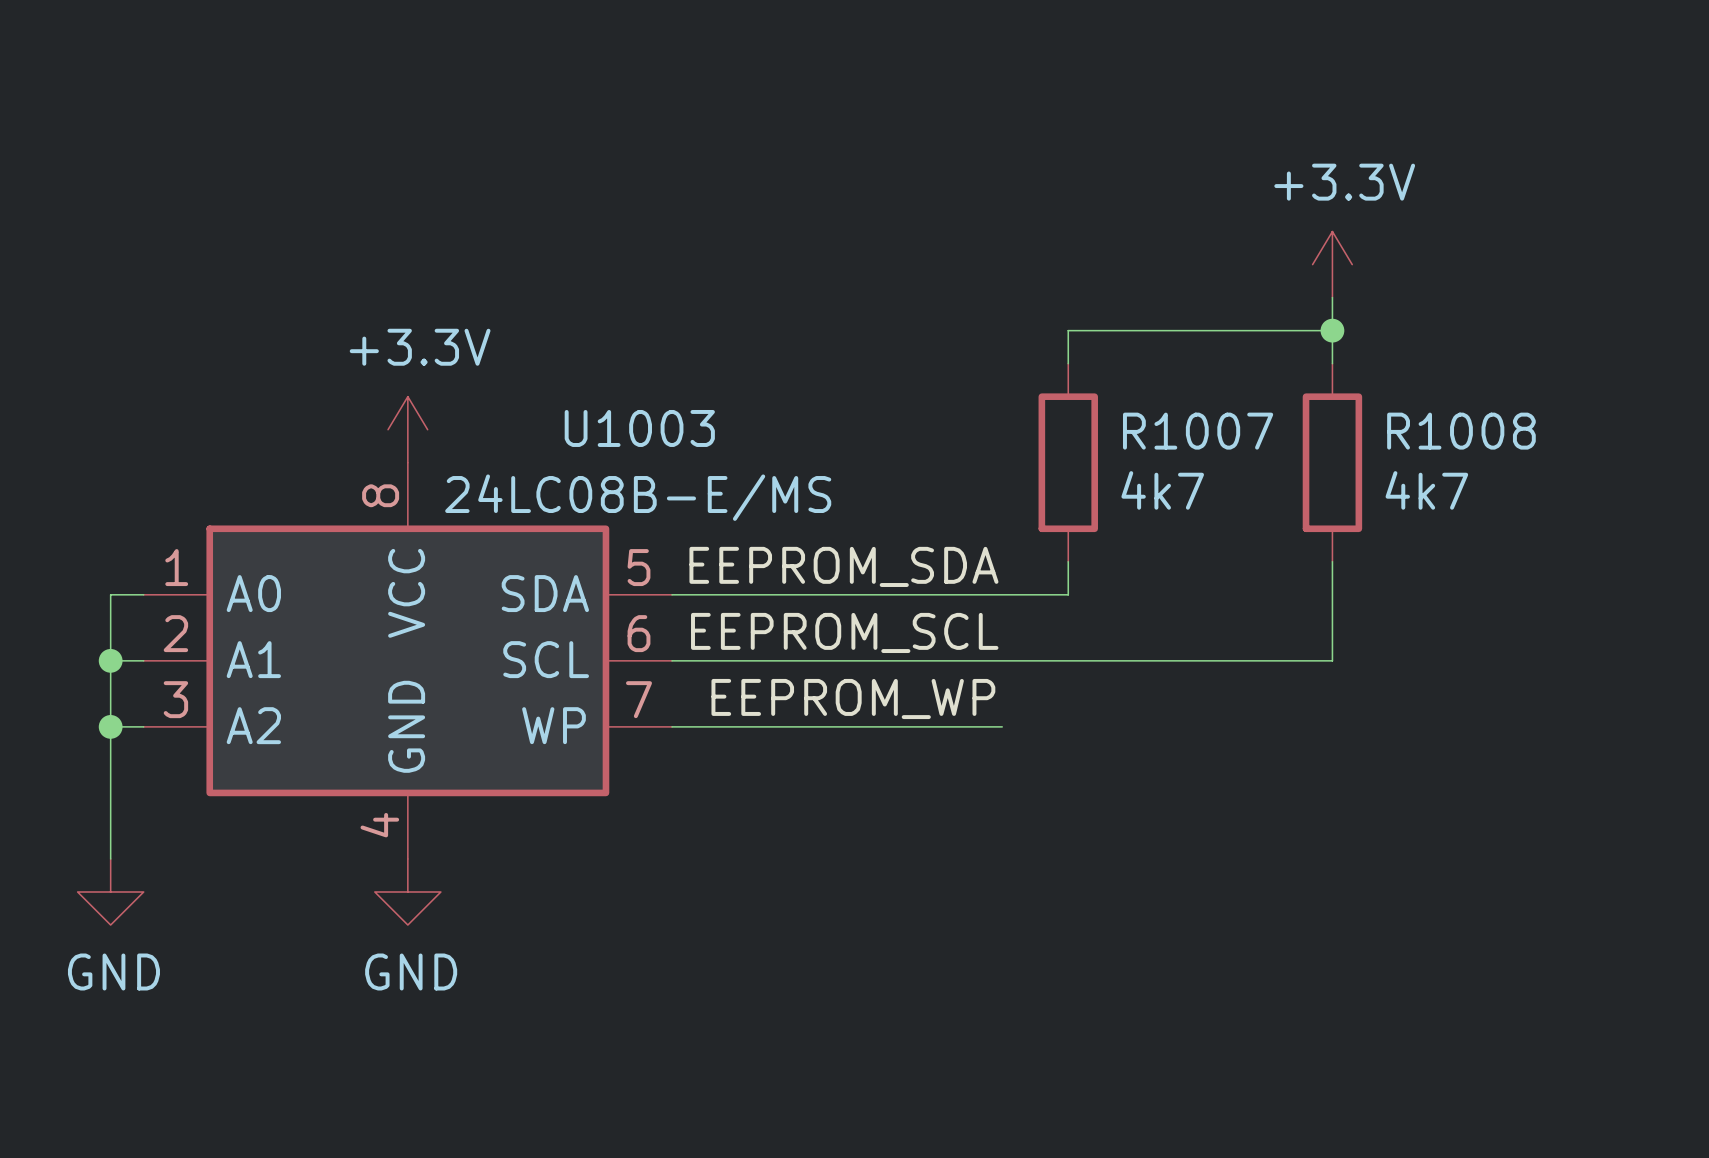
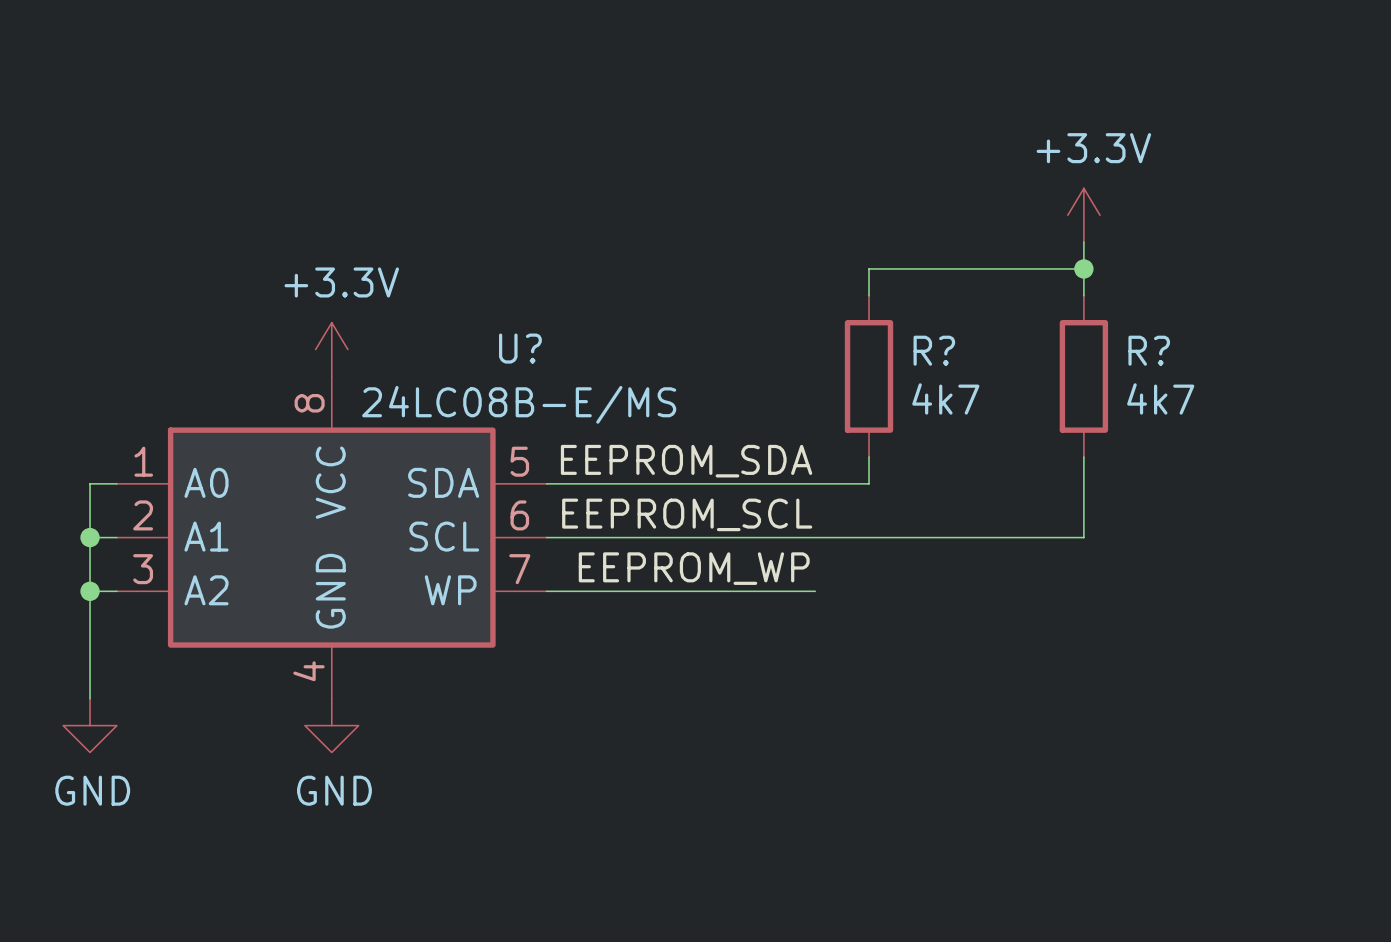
U1003 name: U1003 (639, 428) -> U? (520, 348)
R1007 name: R1007 (1198, 431) -> R? (934, 350)
R1008 name: R1008 (1461, 431) -> R? (1149, 350)

